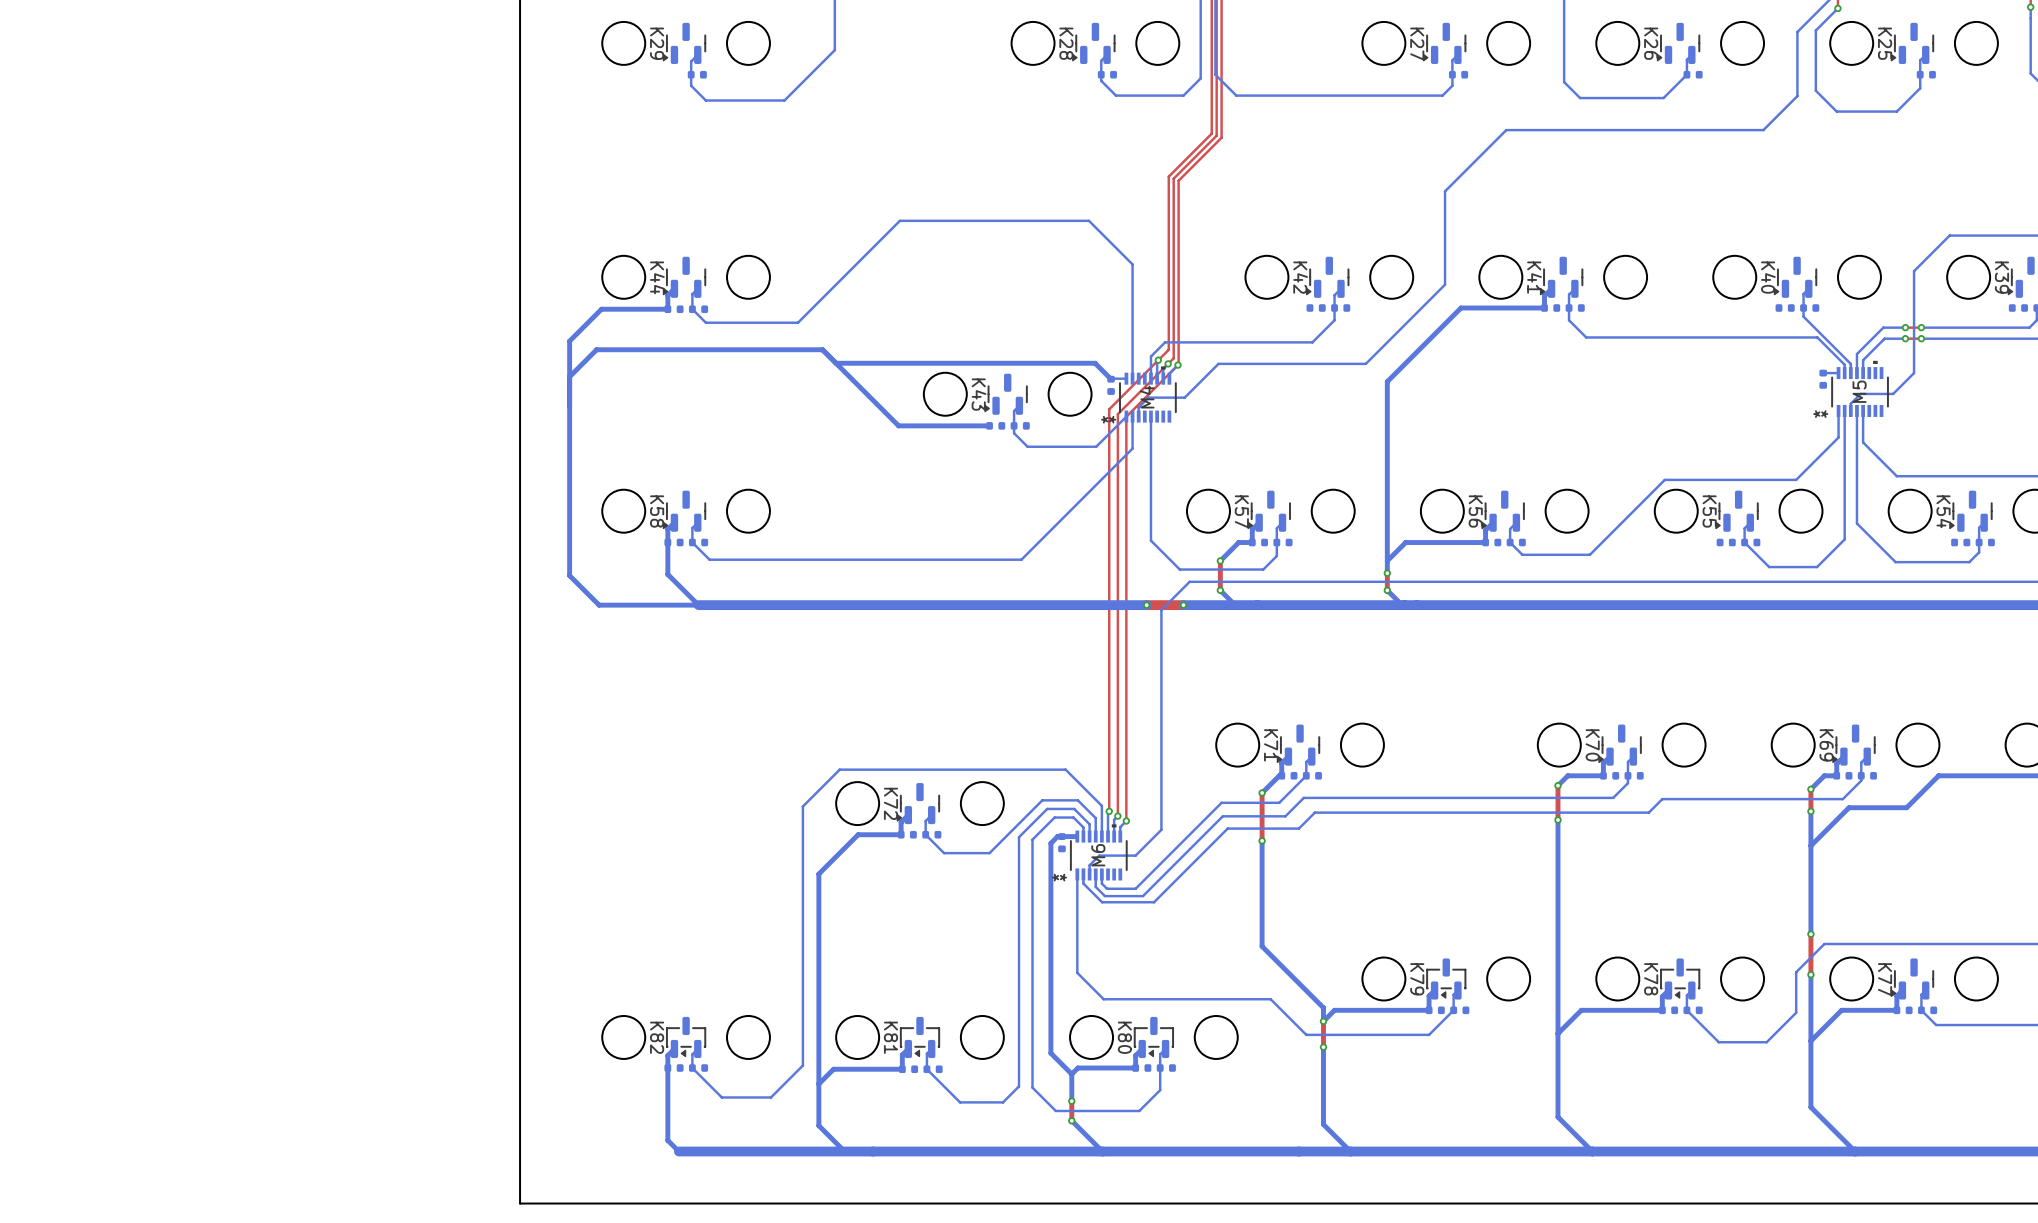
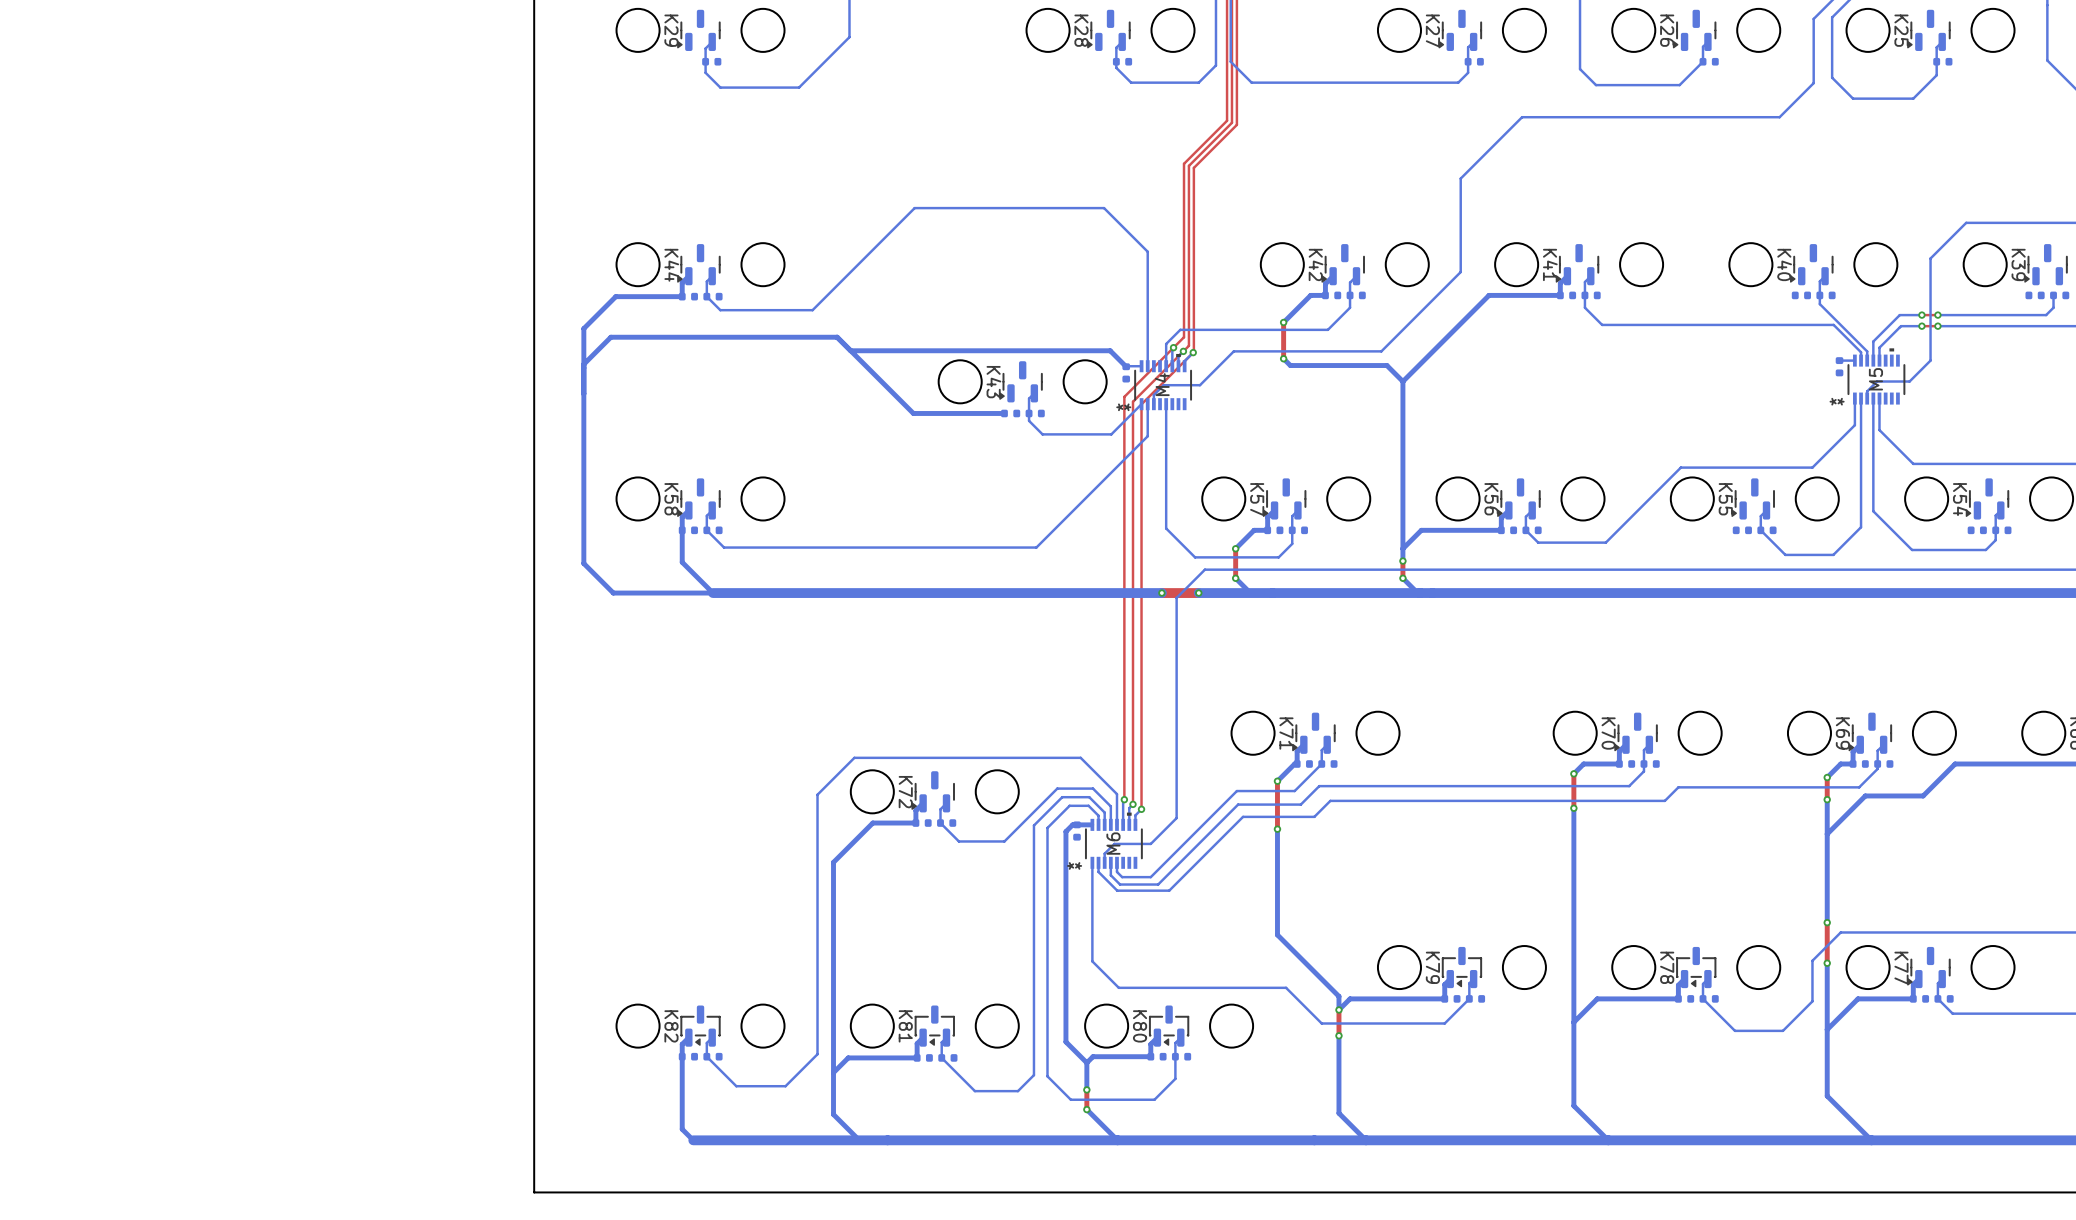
bottom track: none -> (1333, 276) (1325, 283) (1325, 295) (1310, 295) (1283, 322)
bottom track: (1473, 308) (1461, 308) (1387, 381) (1387, 393) -> (1489, 295) (1402, 381) (1386, 365) (1290, 365) (1283, 358)
top track: none -> (1283, 322) (1283, 358)
via: none -> (1283, 322)
via: none -> (1283, 358)

